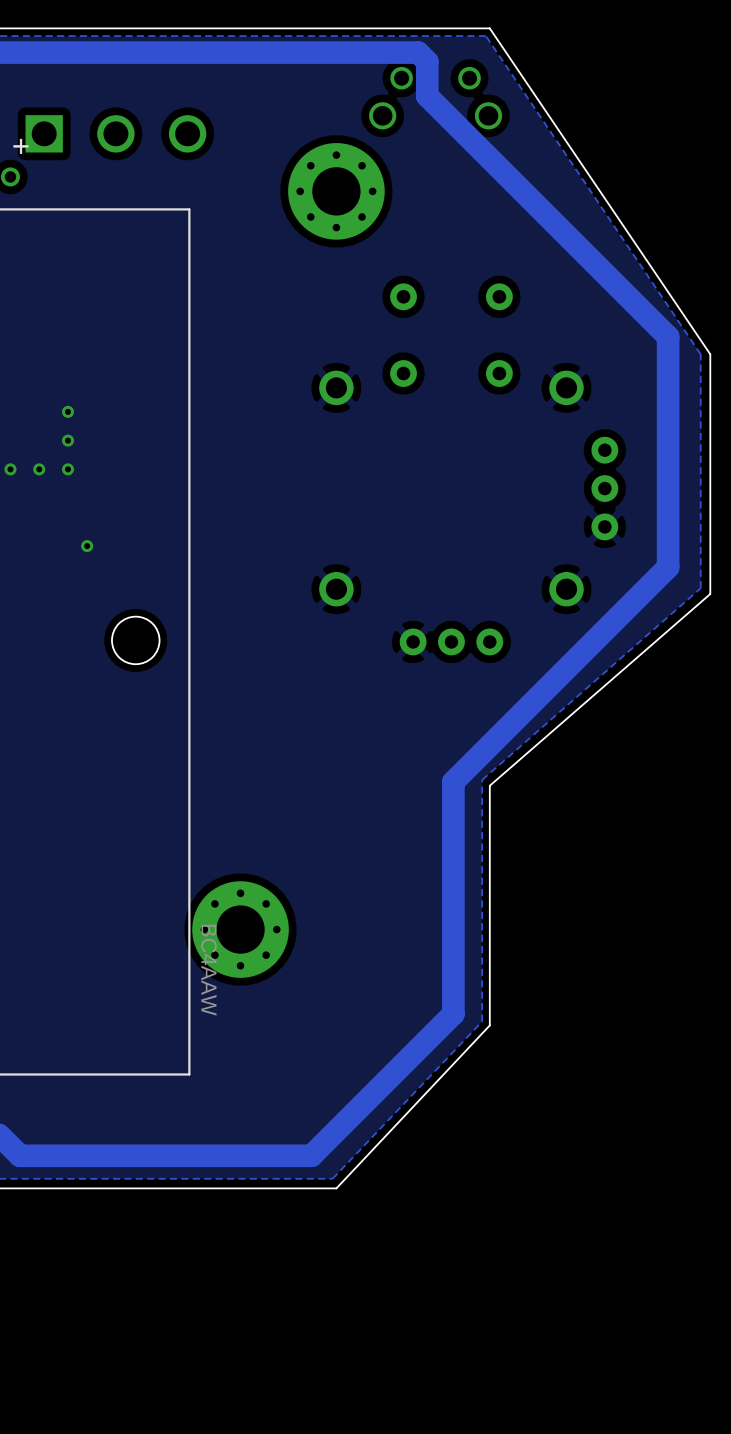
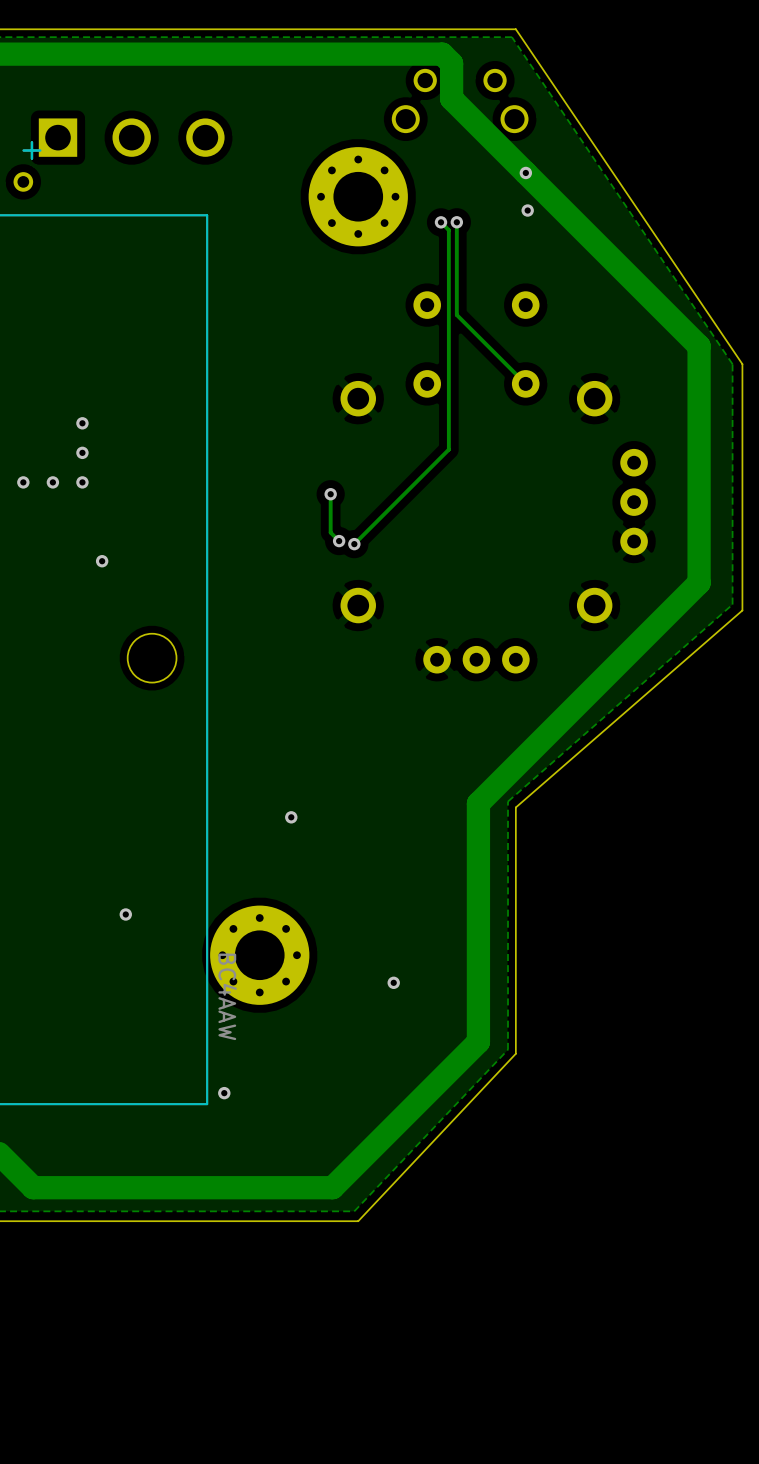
via: none -> (525, 172)
via: none -> (527, 210)
track: none -> (441, 222) (448, 230) (448, 449) (354, 544)
via: none -> (441, 222)
track: none -> (456, 222) (456, 315) (525, 383)
via: none -> (456, 222)
track: none -> (330, 494) (330, 532) (339, 541)
via: none -> (330, 494)
via: none -> (339, 541)
via: none -> (354, 544)
via: none -> (291, 817)
via: none -> (125, 914)
via: none -> (393, 982)
via: none -> (224, 1093)

